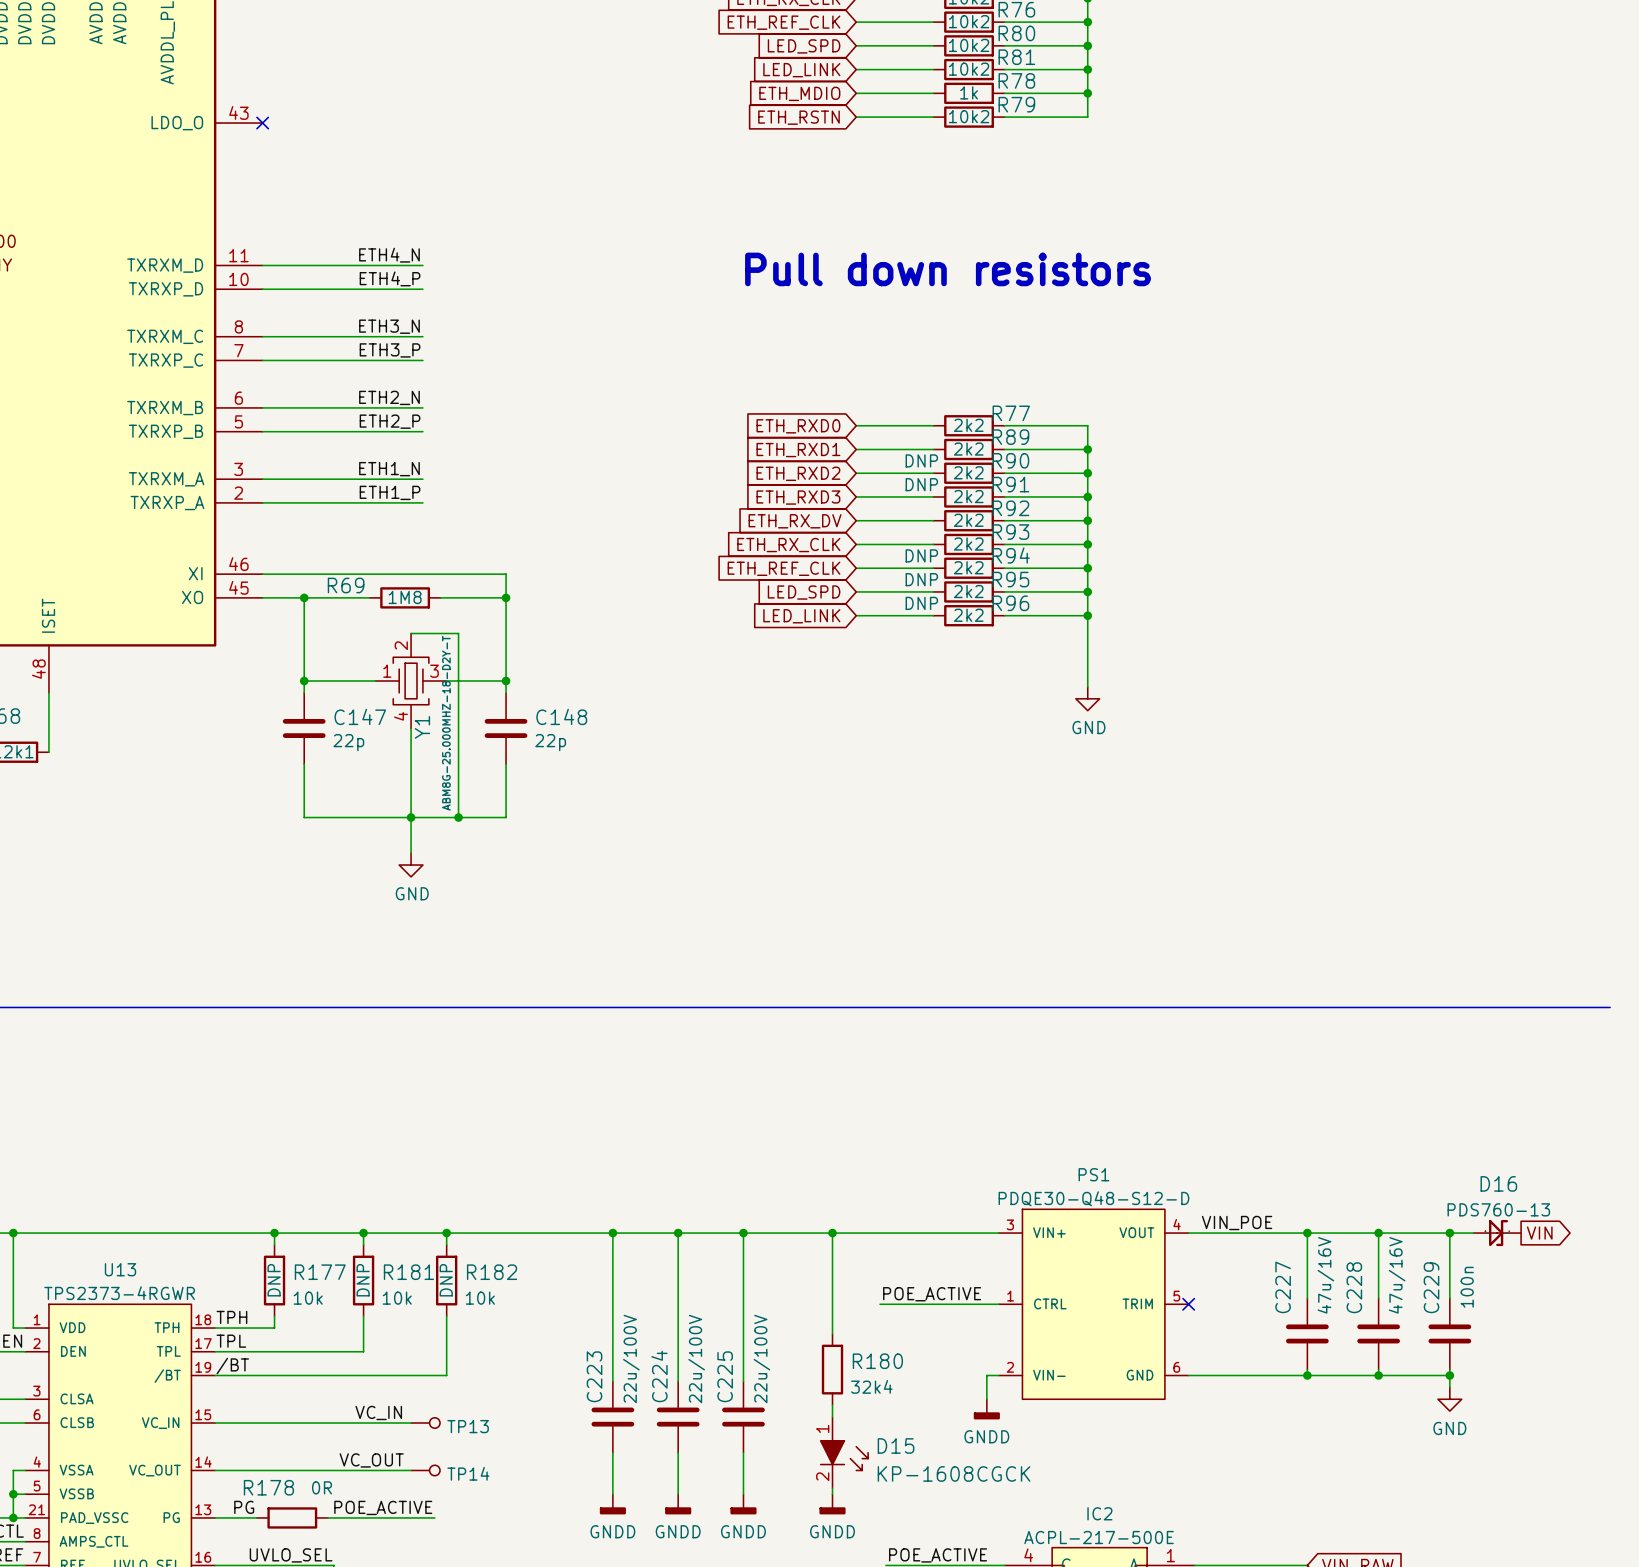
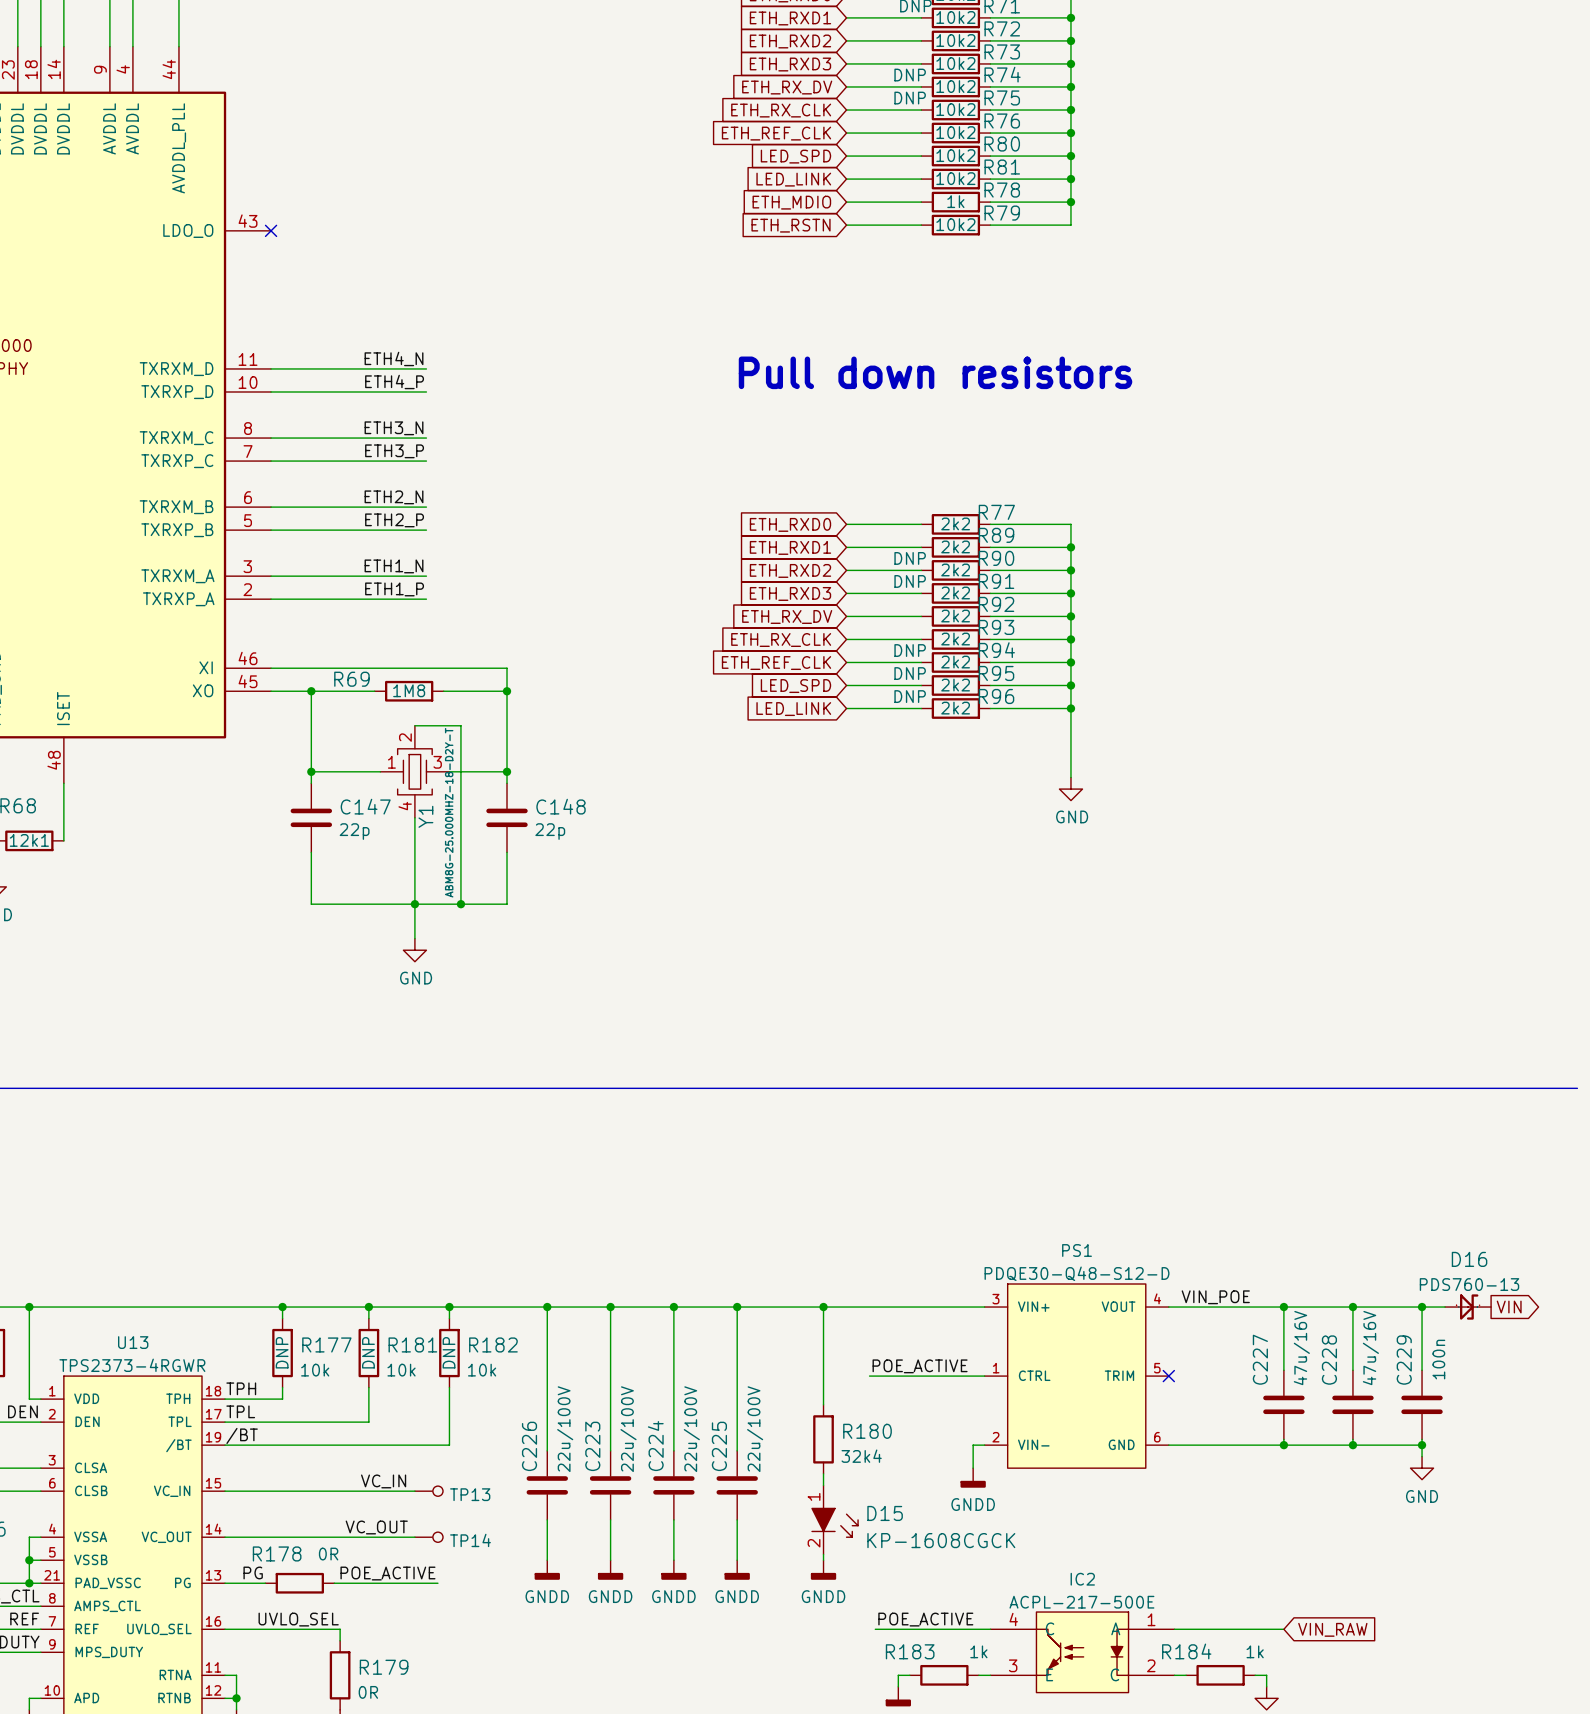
wire: none -> (547, 1307) (547, 1450)
junction: none -> (547, 1307)
C226: none -> (547, 1485)
wire: none -> (547, 1519) (547, 1560)
power symbol: none -> GNDD (547, 1570)

